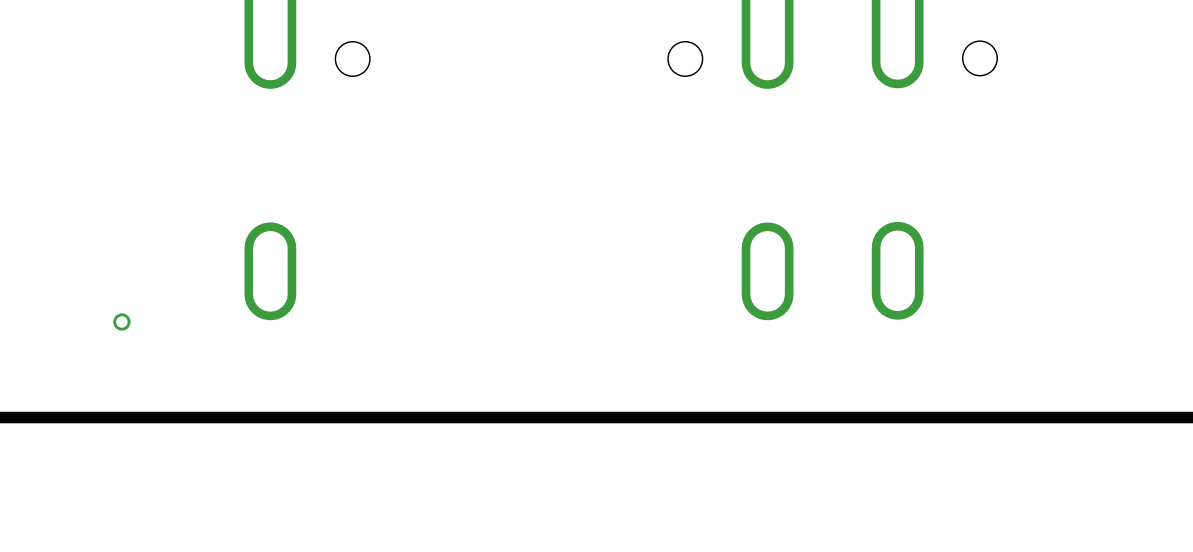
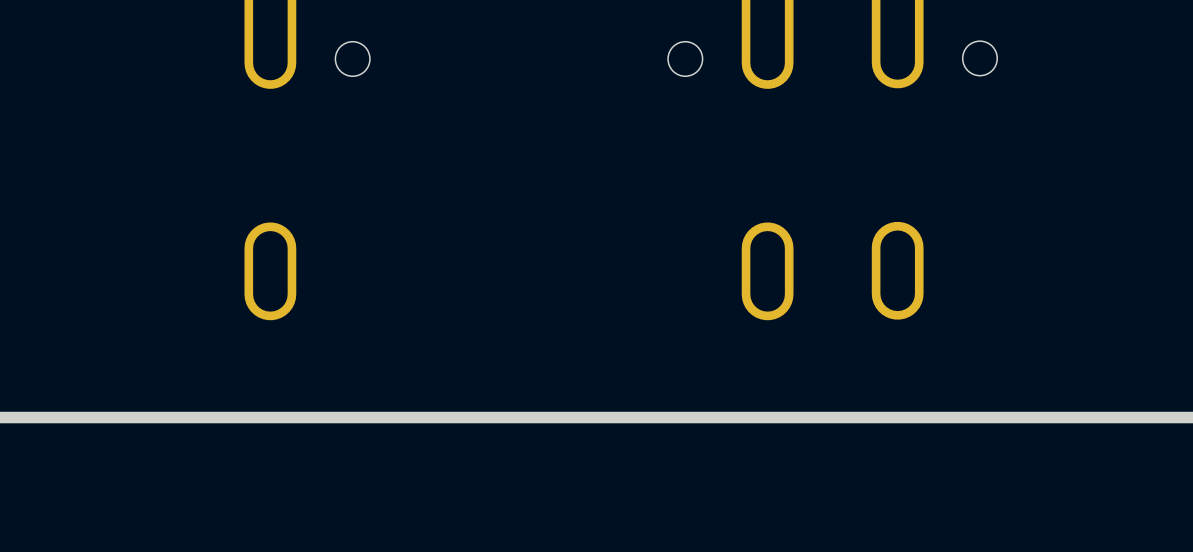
via: (121, 321) -> none

